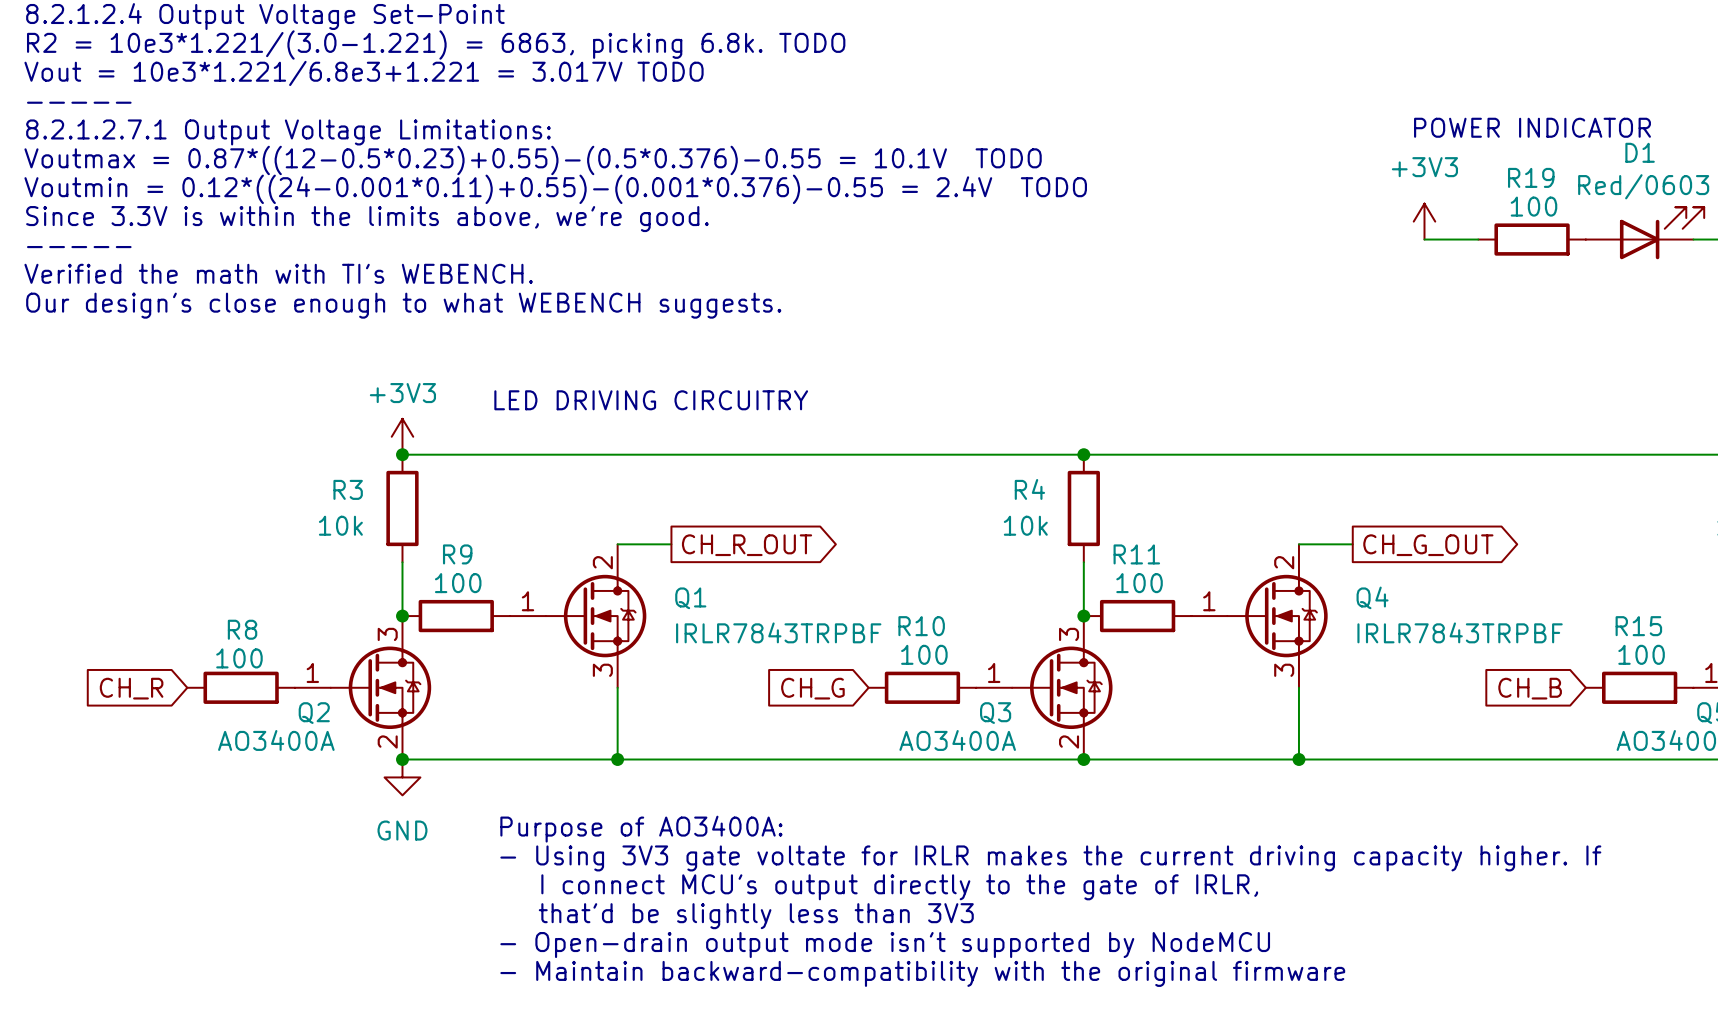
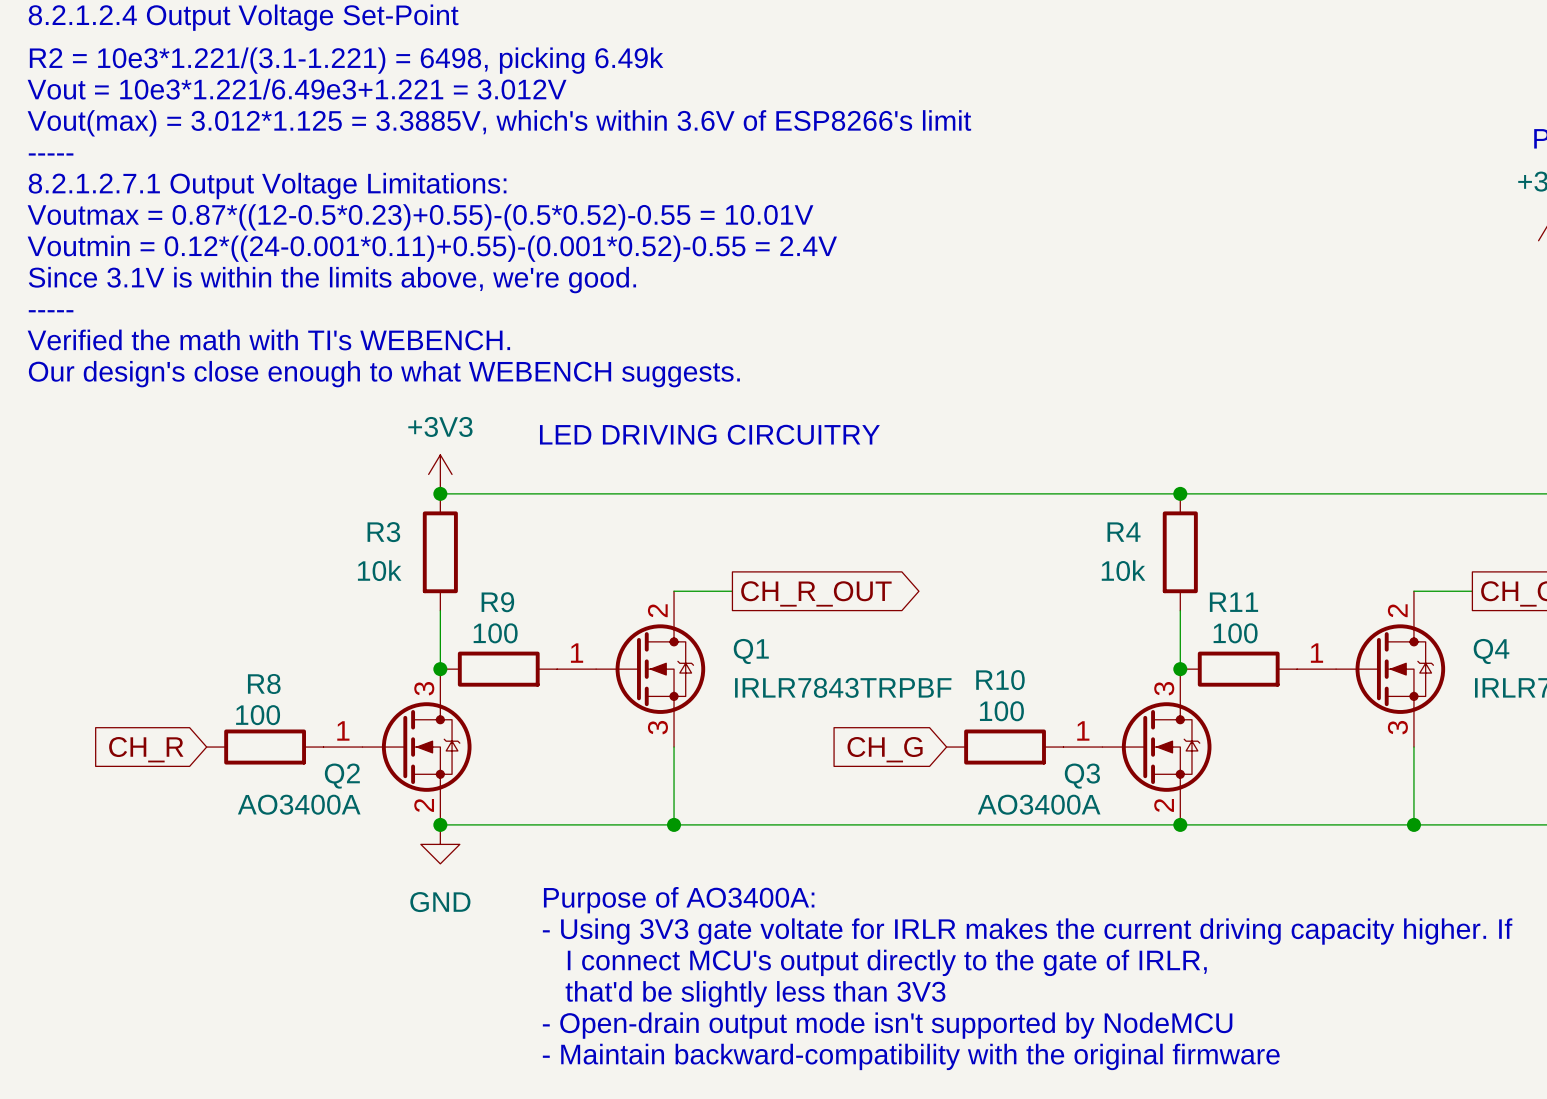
text: R2 = 10e3*1.221/(3.0-1.221) = 6863, picking 6.8k. TODO (436, 44) -> R2 = 10e3*1.221/(3.1-1.221) = 6498, picking 6.49k (346, 60)
text: Vout = 10e3*1.221/6.8e3+1.221 = 3.017V TODO (364, 73) -> Vout = 10e3*1.221/6.49e3+1.221 = 3.012V (297, 89)
text position: ----- (79, 102) -> ----- (51, 154)
text: none -> Vout(max) = 3.012*1.125 = 3.3885V, which's within 3.6V of ESP8266's limit (499, 123)
text position: 8.2.1.2.7.1 Output Voltage Limitations: (288, 132) -> 8.2.1.2.7.1 Output Voltage Limitations: (267, 186)
text: Voutmax = 0.87*((12-0.5*0.23)+0.55)-(0.5*0.376)-0.55 = 10.1V TODO (533, 160) -> none
text: Voutmin = 0.12*((24-0.001*0.11)+0.55)-(0.001*0.376)-0.55 = 2.4V TODO (555, 189) -> Voutmax = 0.87*((12-0.5*0.23)+0.55)-(0.5*0.52)-0.55 = 10.01V (420, 217)
text: Since 3.3V is within the limits above, we're good. (367, 219) -> none
text: none -> Voutmin = 0.12*((24-0.001*0.11)+0.55)-(0.001*0.52)-0.55 = 2.4V (432, 248)
text position: ----- (79, 247) -> ----- (51, 311)
text: none -> Since 3.1V is within the limits above, we're good. (332, 280)
text position: Verified the math with TI's WEBENCH. (278, 273) -> Verified the math with TI's WEBENCH. (268, 339)
text position: Our design's close enough to what WEBENCH suggests. (403, 305) -> Our design's close enough to what WEBENCH suggests. (384, 374)

